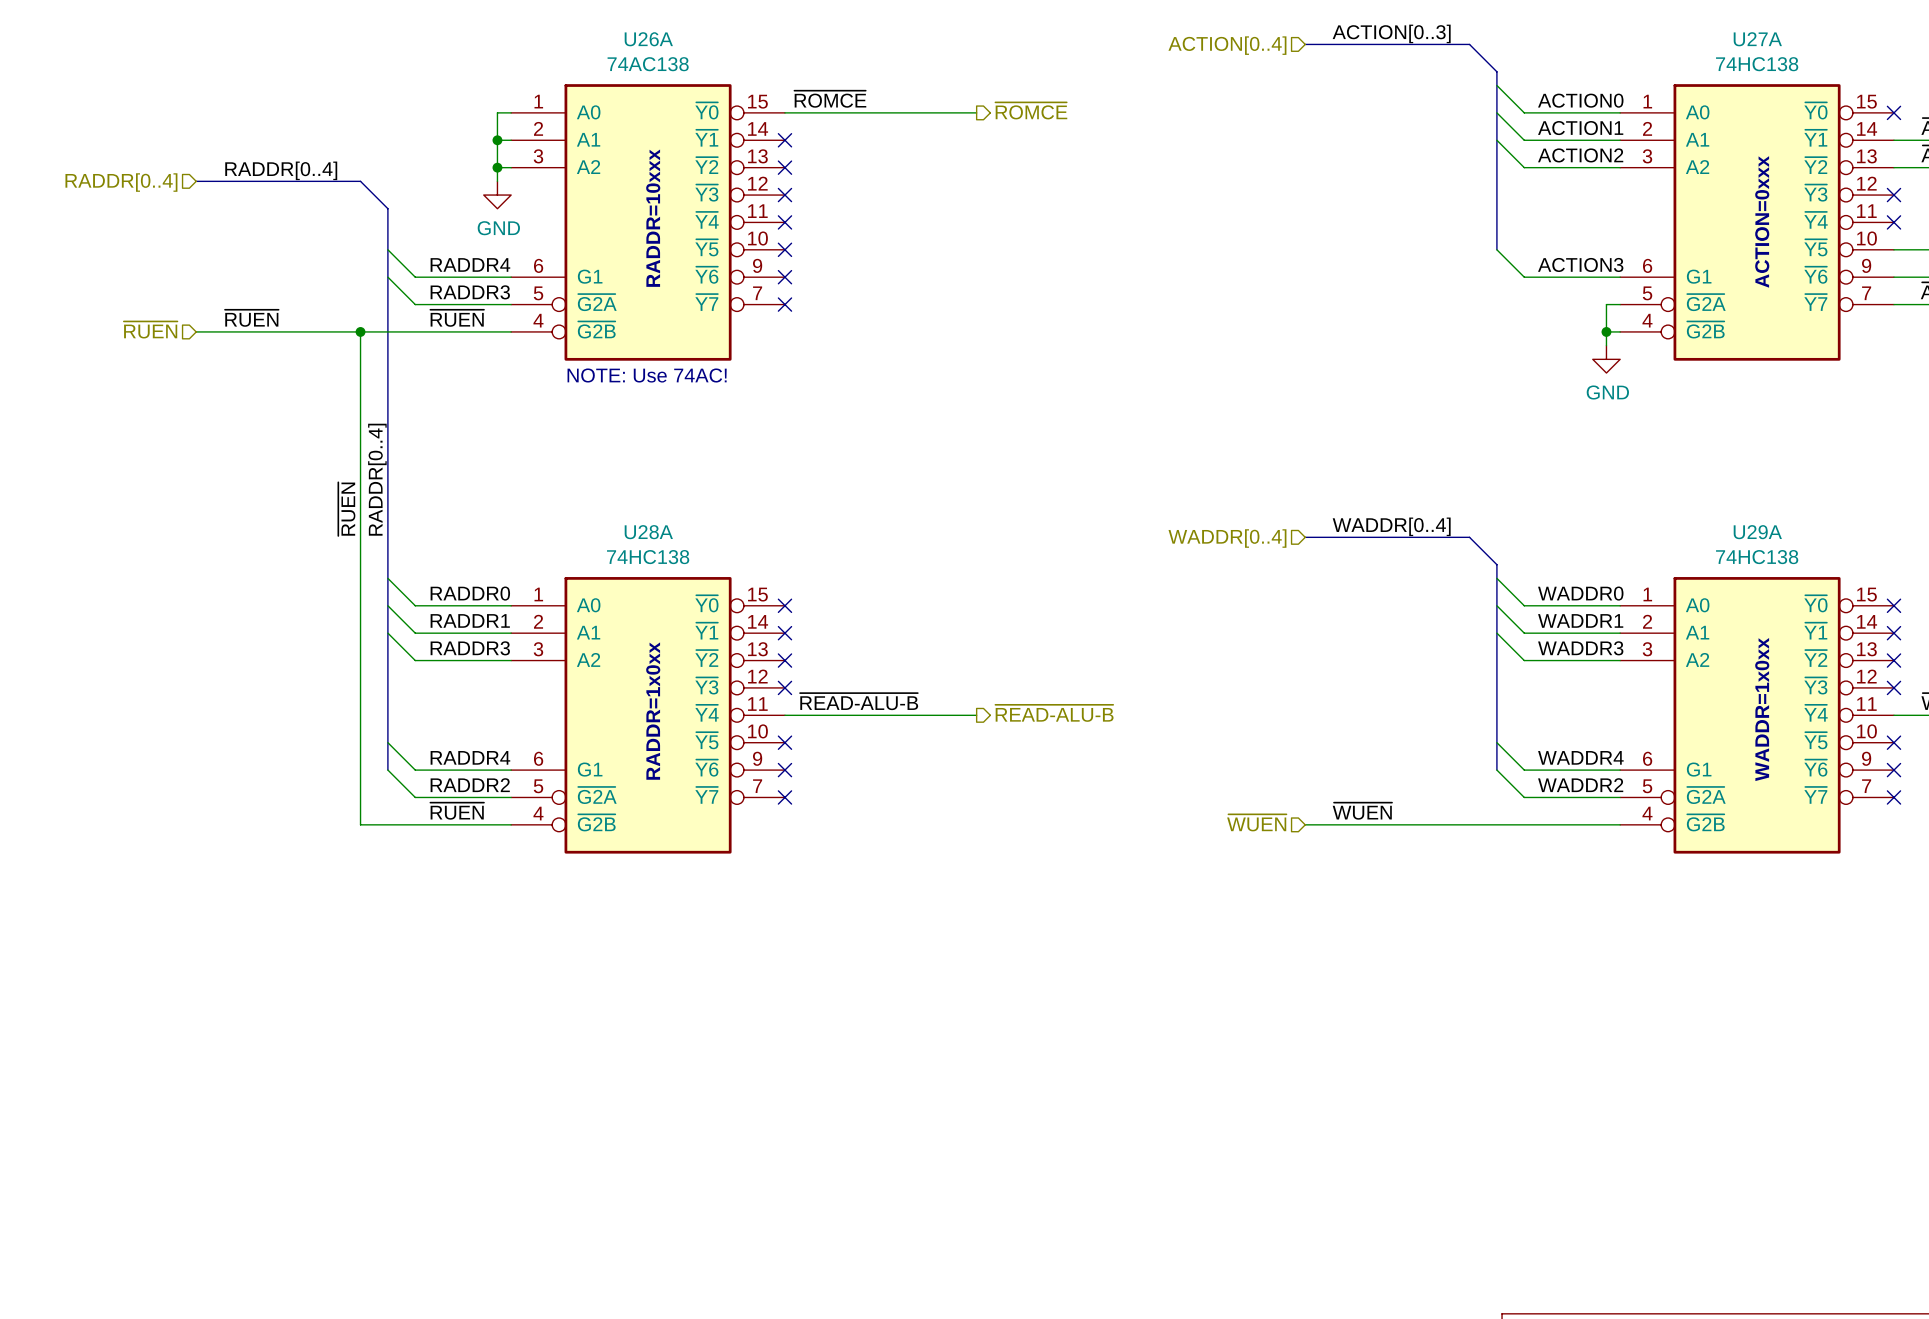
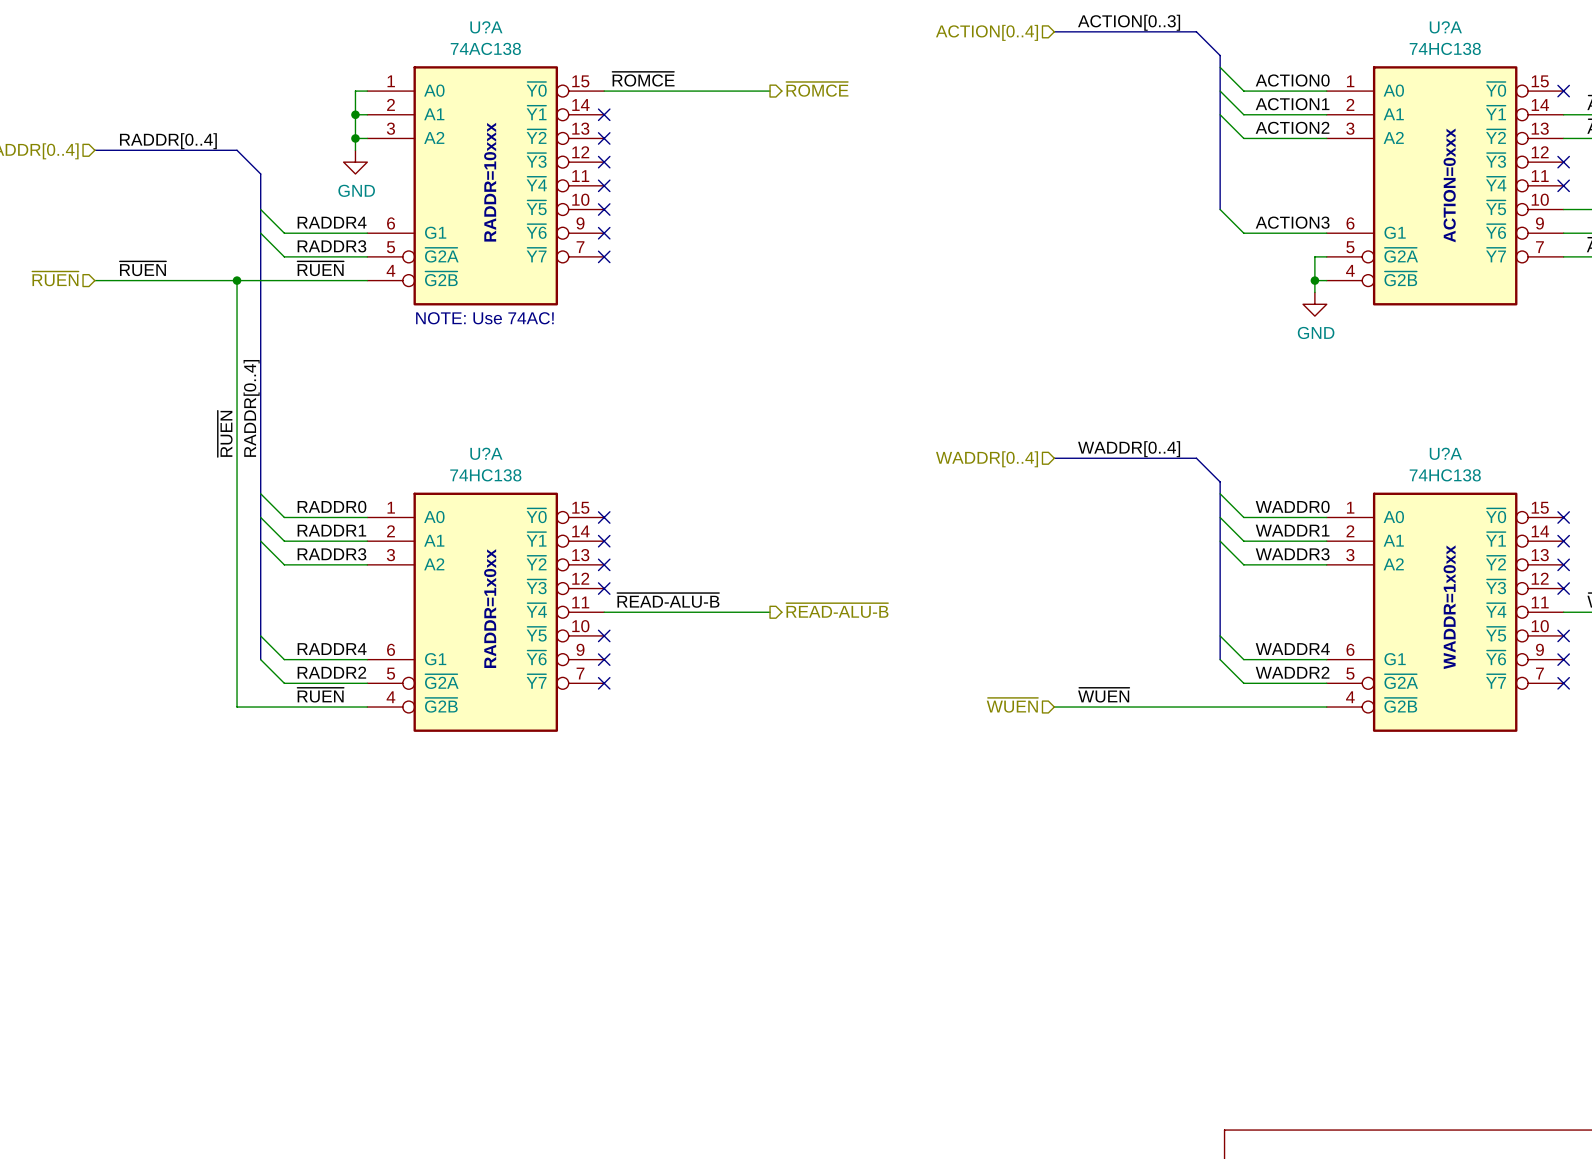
U26A name: U26A (648, 39) -> U?A (486, 27)
U27A name: U27A (1757, 39) -> U?A (1445, 27)
U28A name: U28A (648, 532) -> U?A (486, 453)
U29A name: U29A (1757, 532) -> U?A (1445, 453)

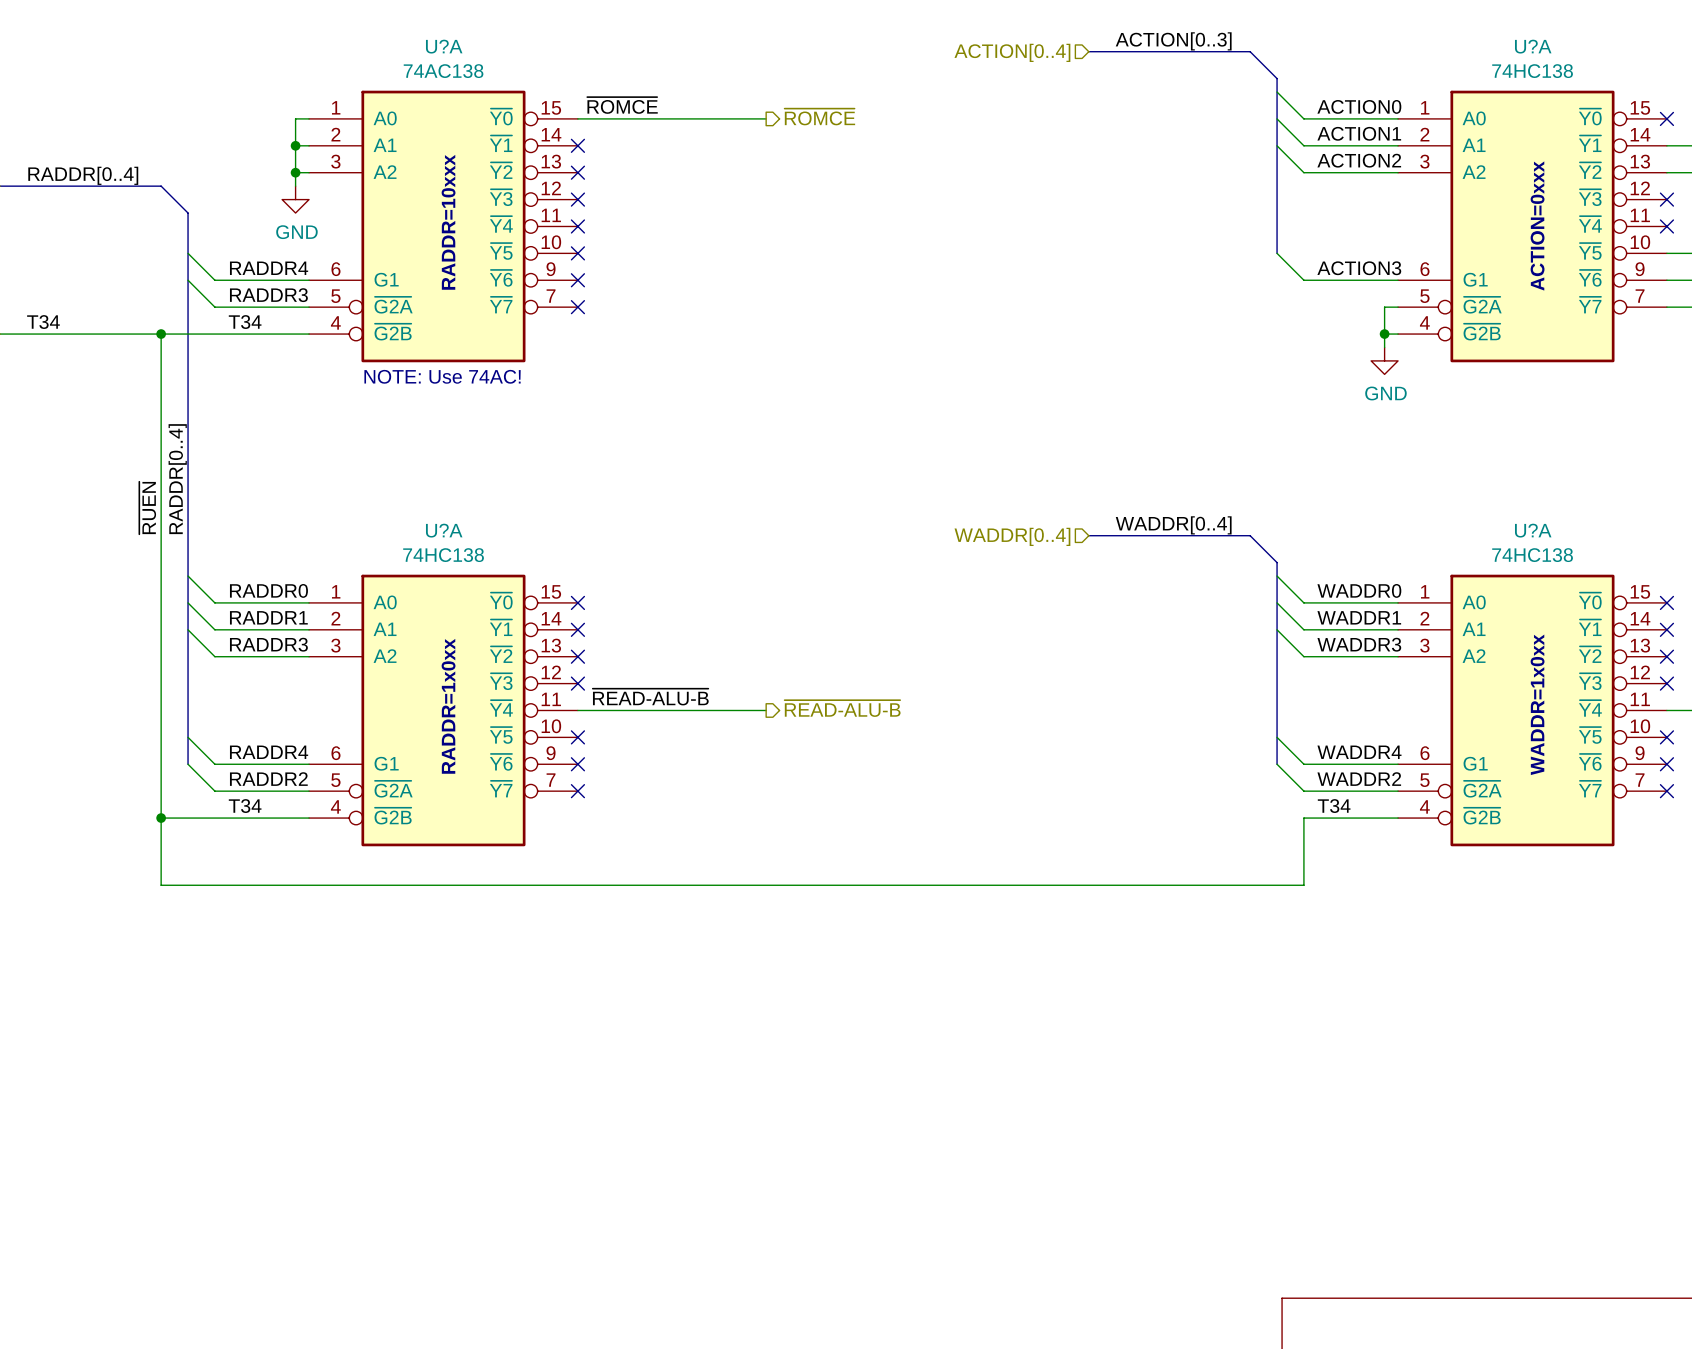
label: ~{RUEN} (142, 268) -> T34 (43, 322)
label: ~{RUEN} (320, 268) -> T34 (245, 322)
label: ~{RUEN} (320, 695) -> T34 (245, 806)
label: ~{WUEN} (1103, 695) -> none
label: none -> T34 (1334, 806)
hierarchical label: ~{WUEN} (1012, 705) -> none
junction: none -> (161, 818)
wire: (1054, 707) (1243, 707) -> (161, 818) (161, 885) (1303, 885) (1303, 818)

